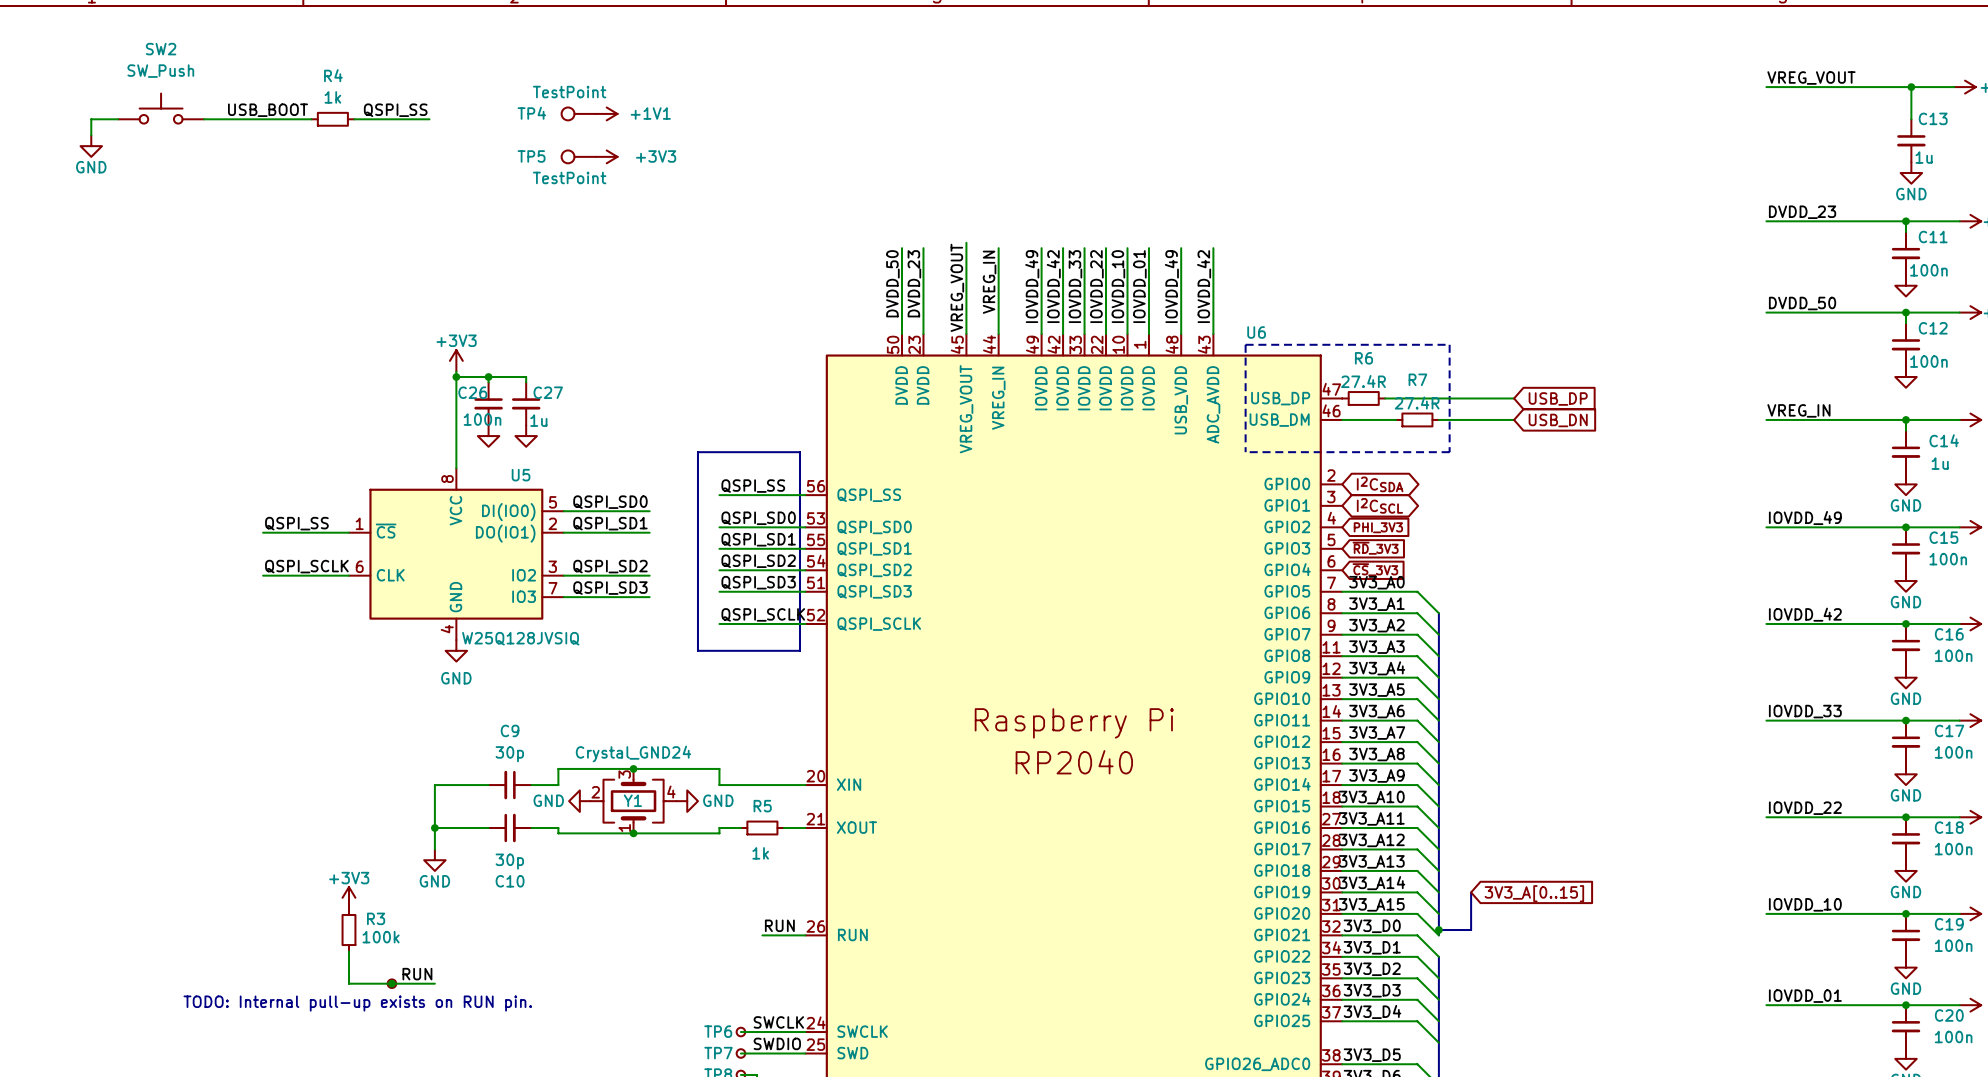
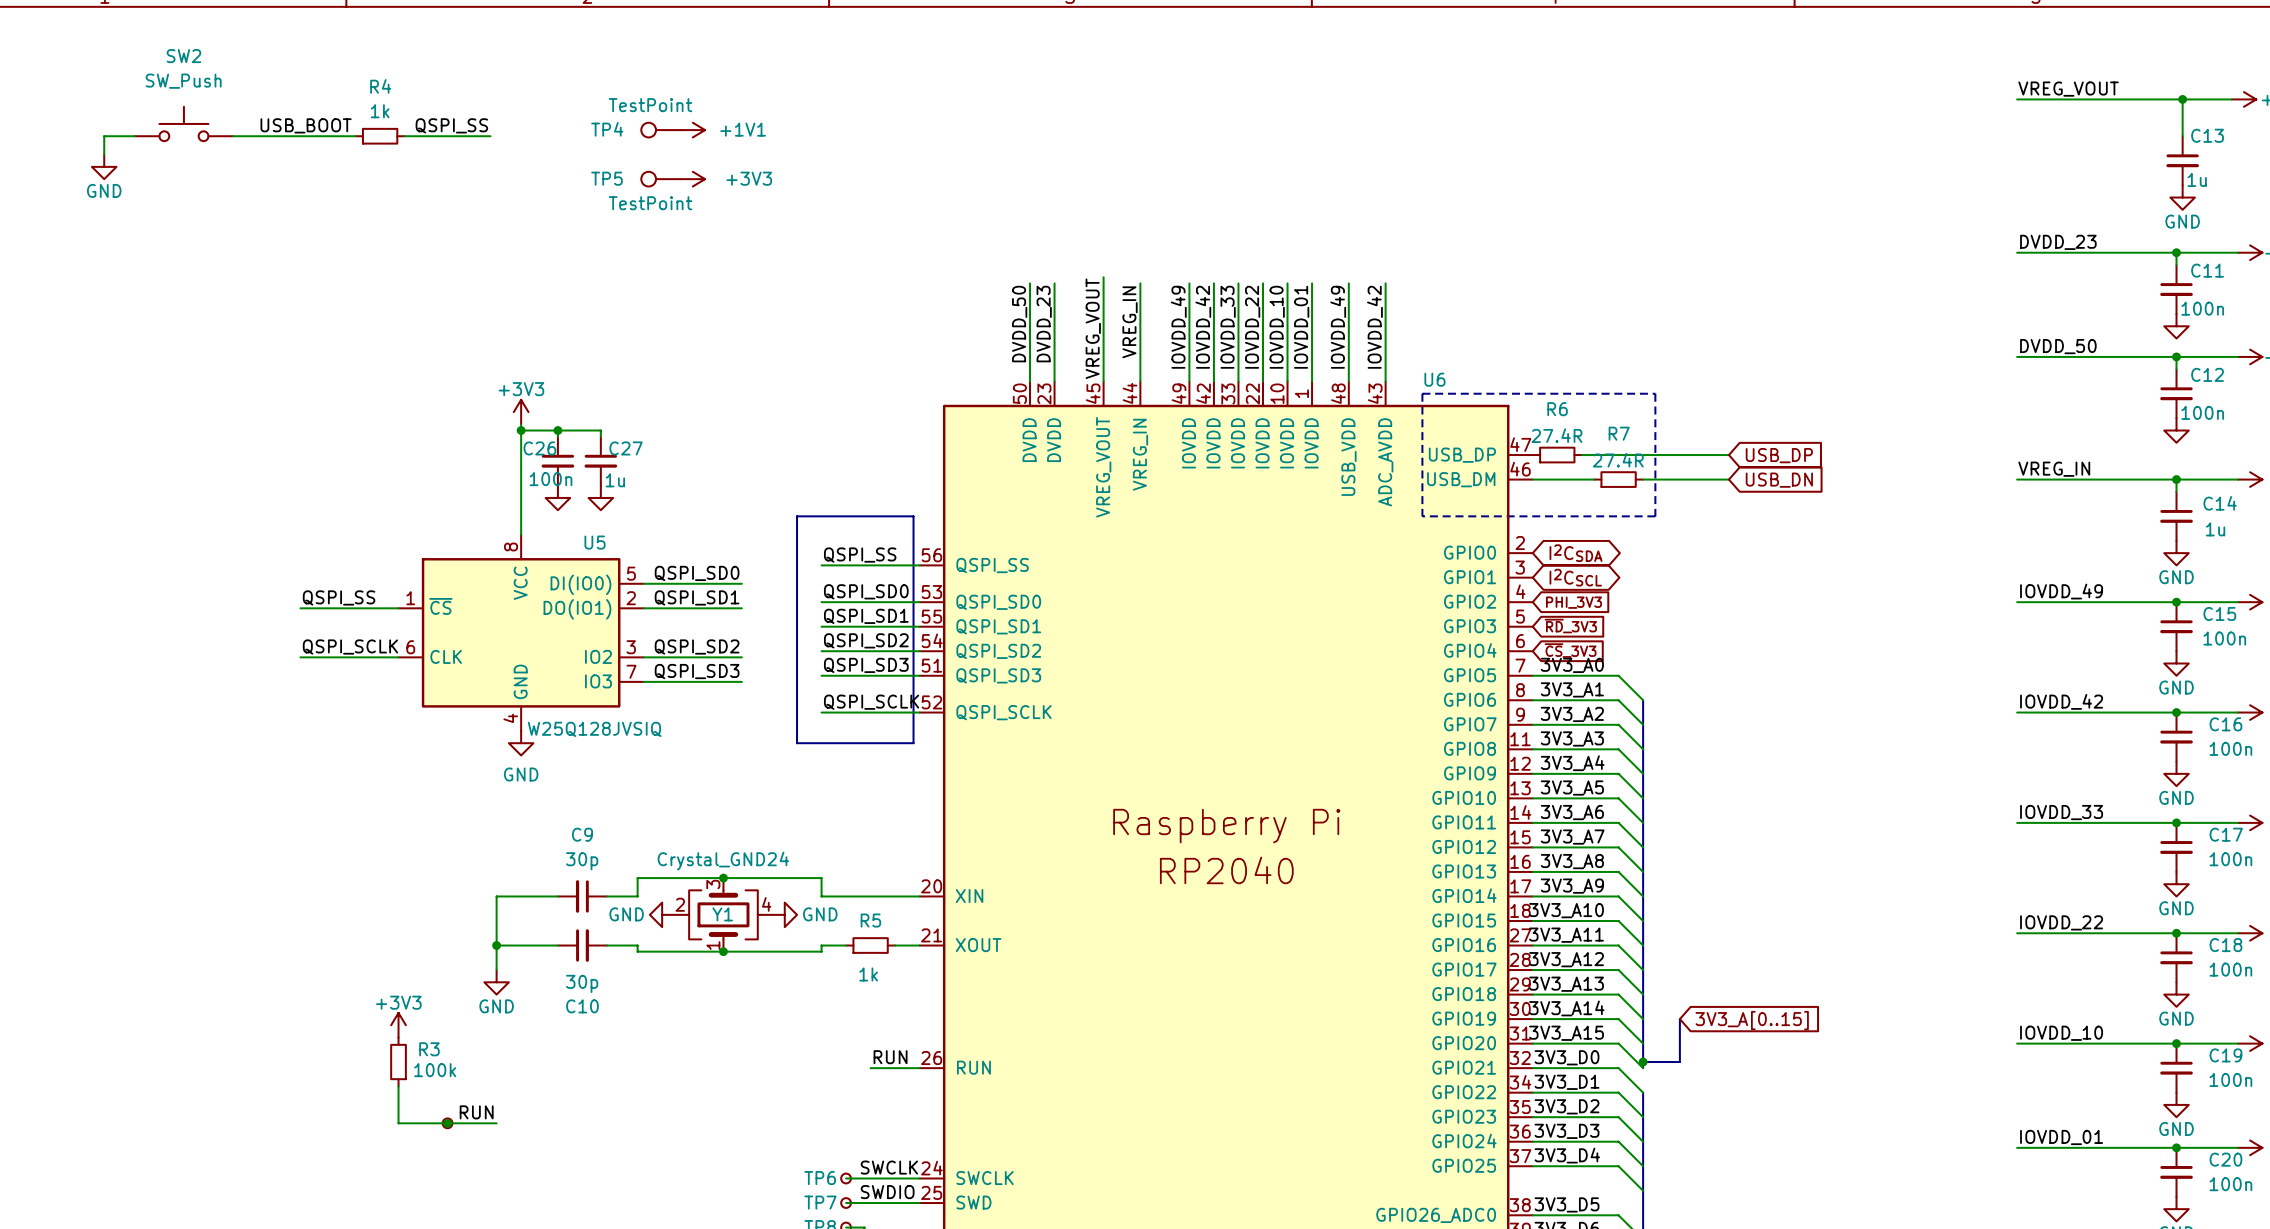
text: TODO: Internal pull-up exists on RUN pin. (357, 1003) -> none

